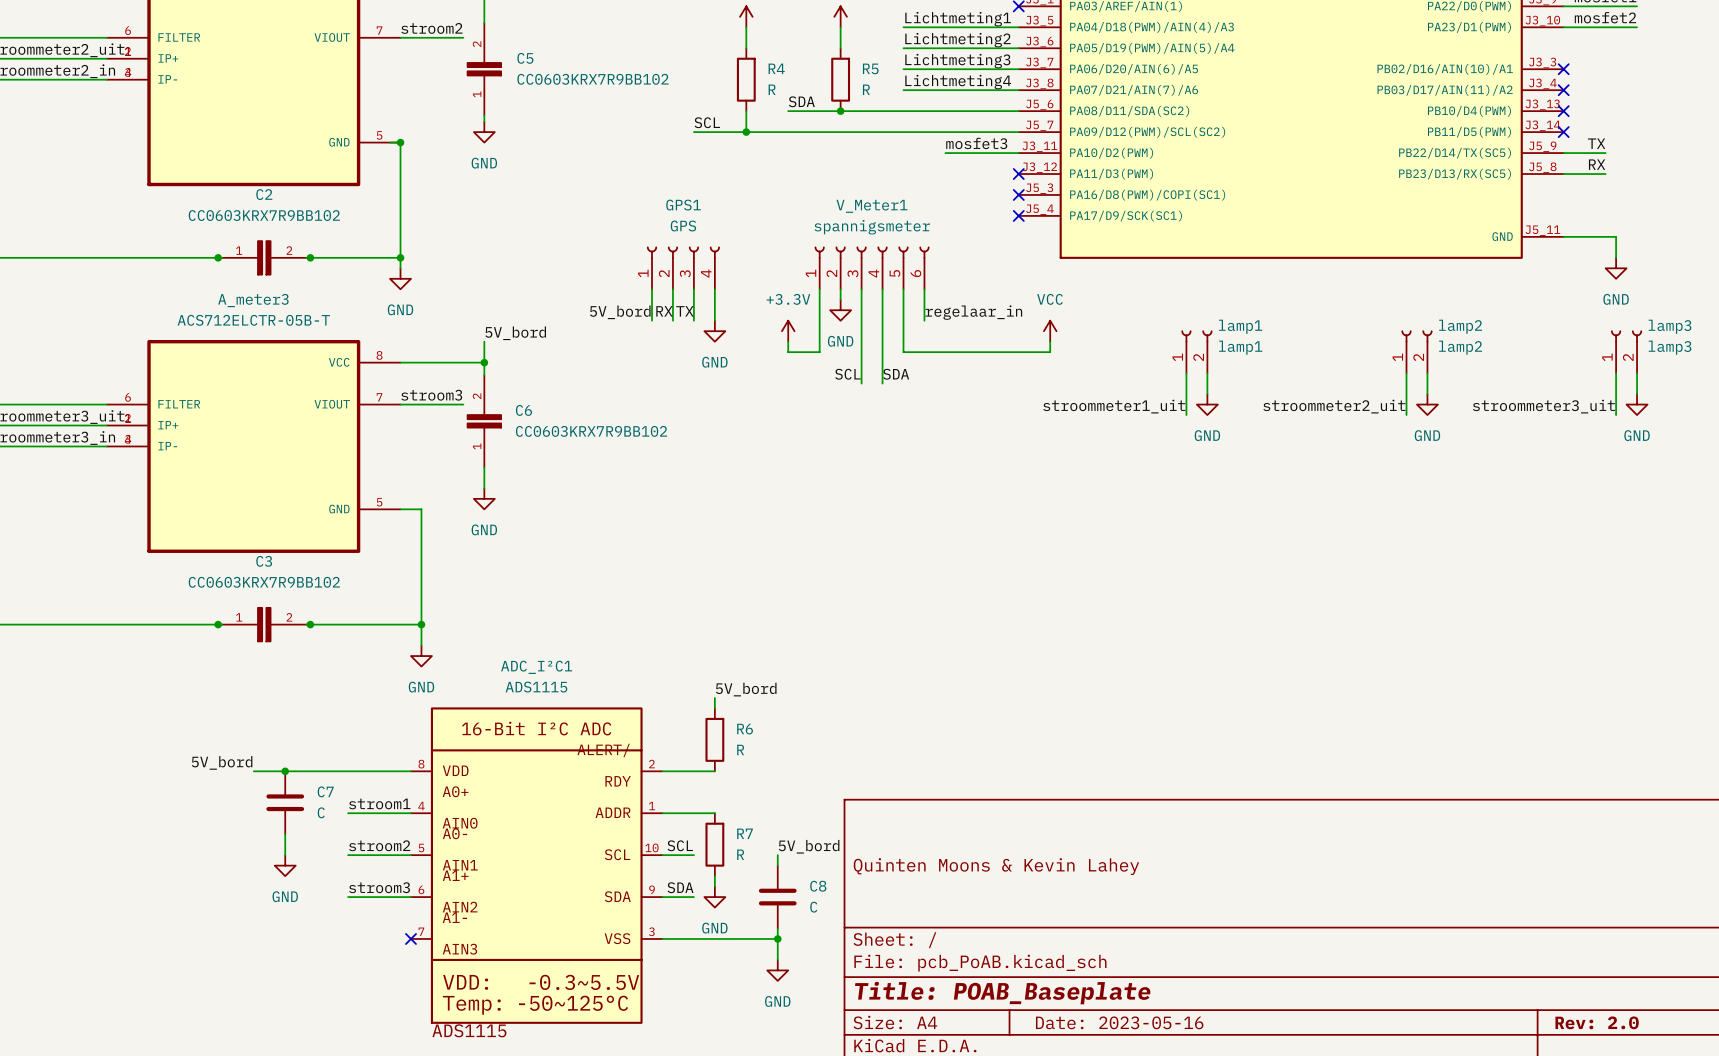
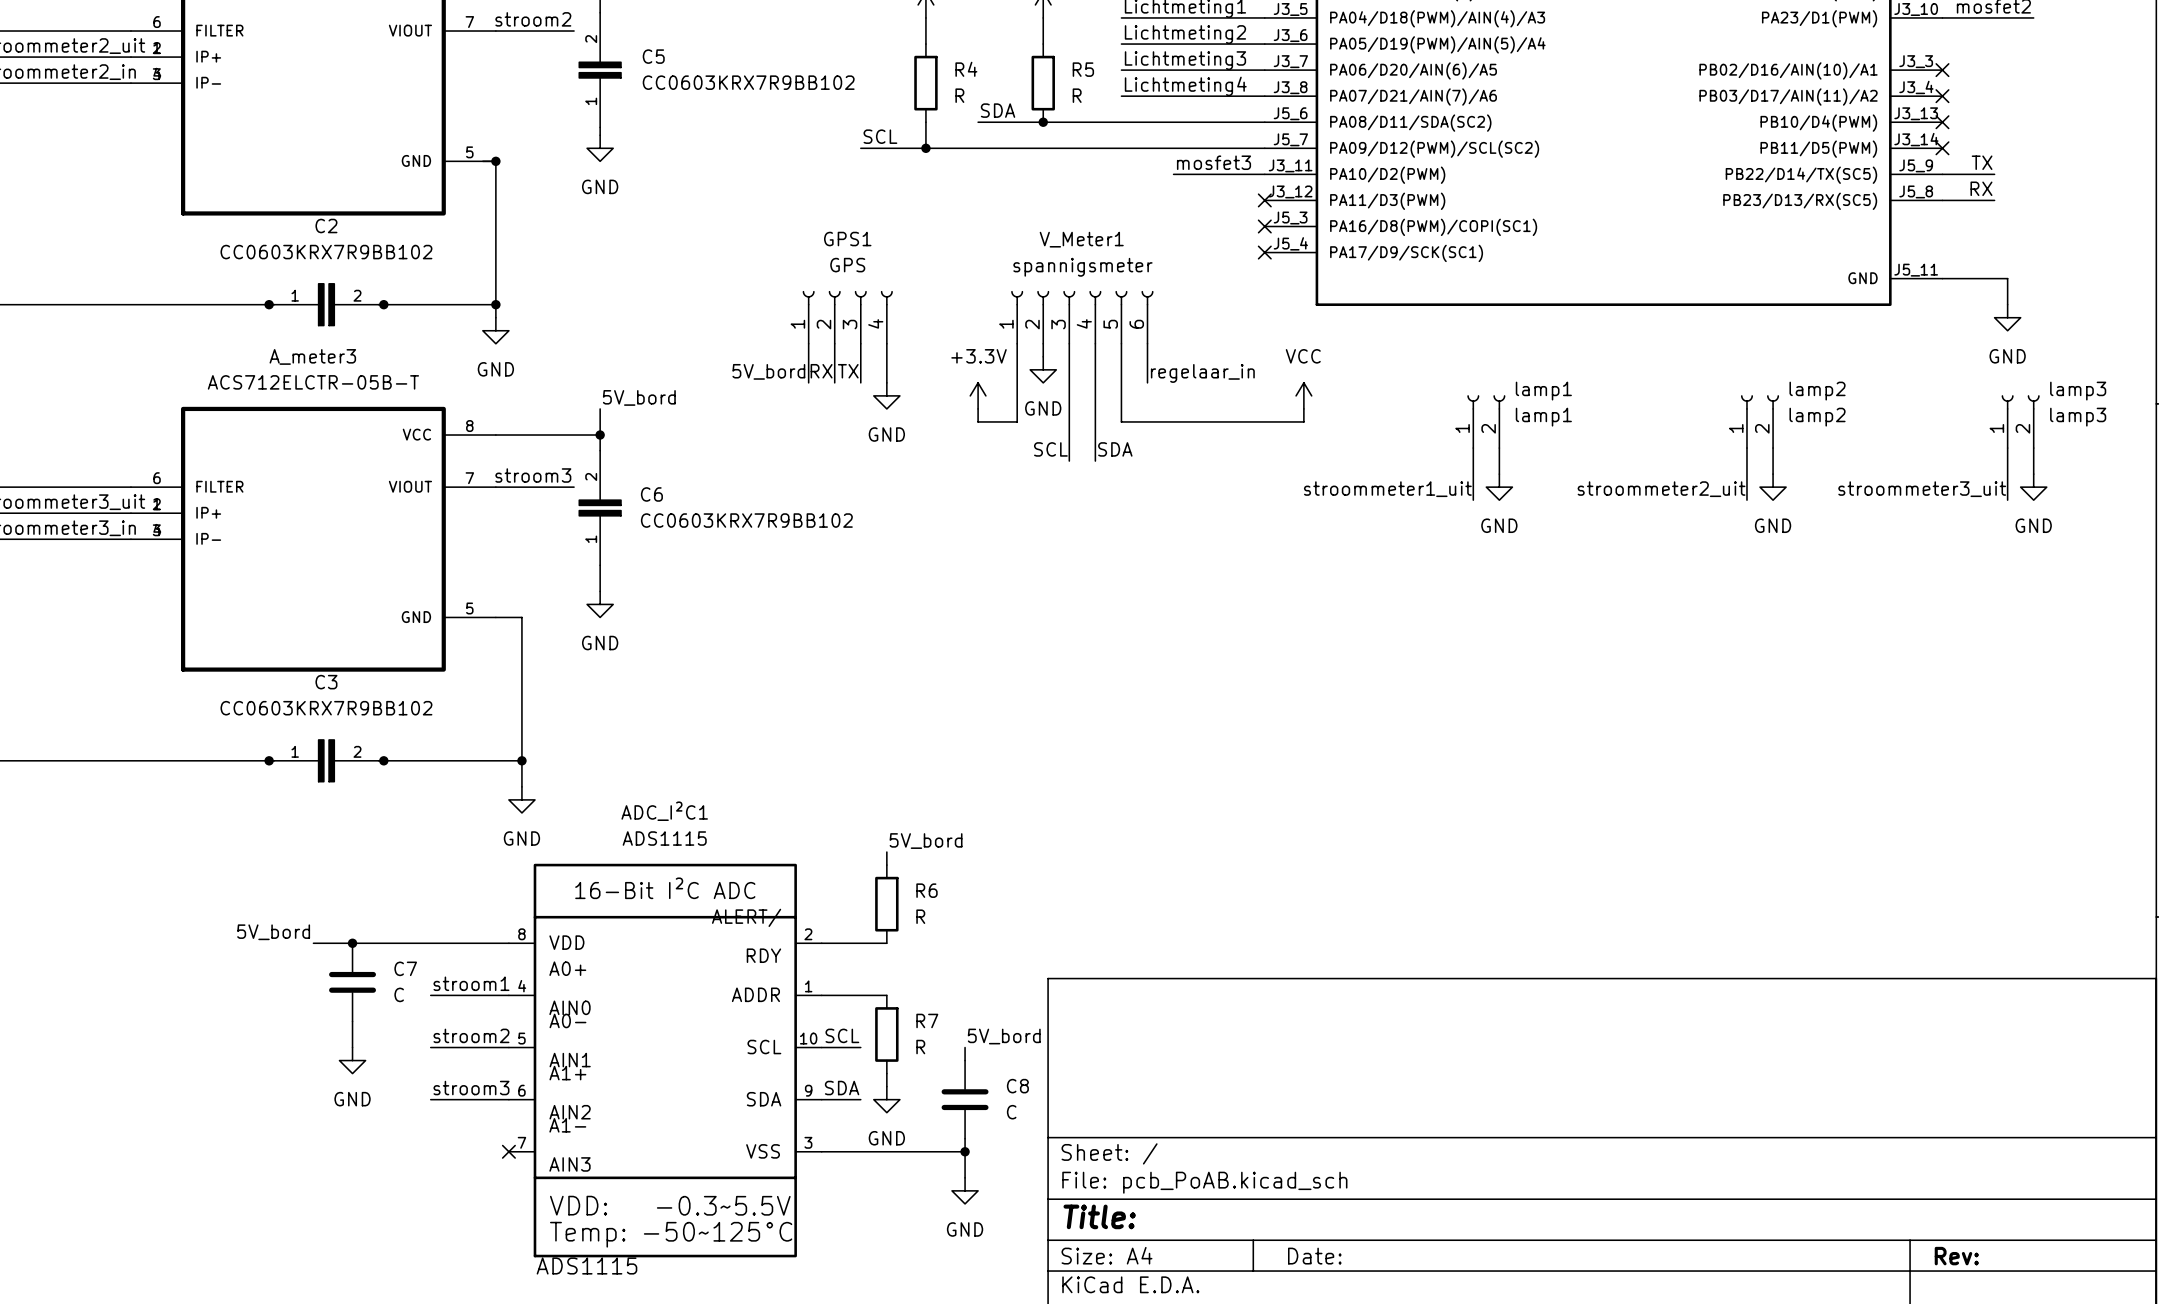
title block: Quinten Moons & Kevin Lahey (996, 866) -> none
title block: Title: POAB_Baseplate (1002, 993) -> Title: (1099, 1216)
title block: Date: 2023-05-16 (1119, 1022) -> Date: (1314, 1256)
title block: Rev: 2.0 (1597, 1022) -> Rev: (1956, 1256)

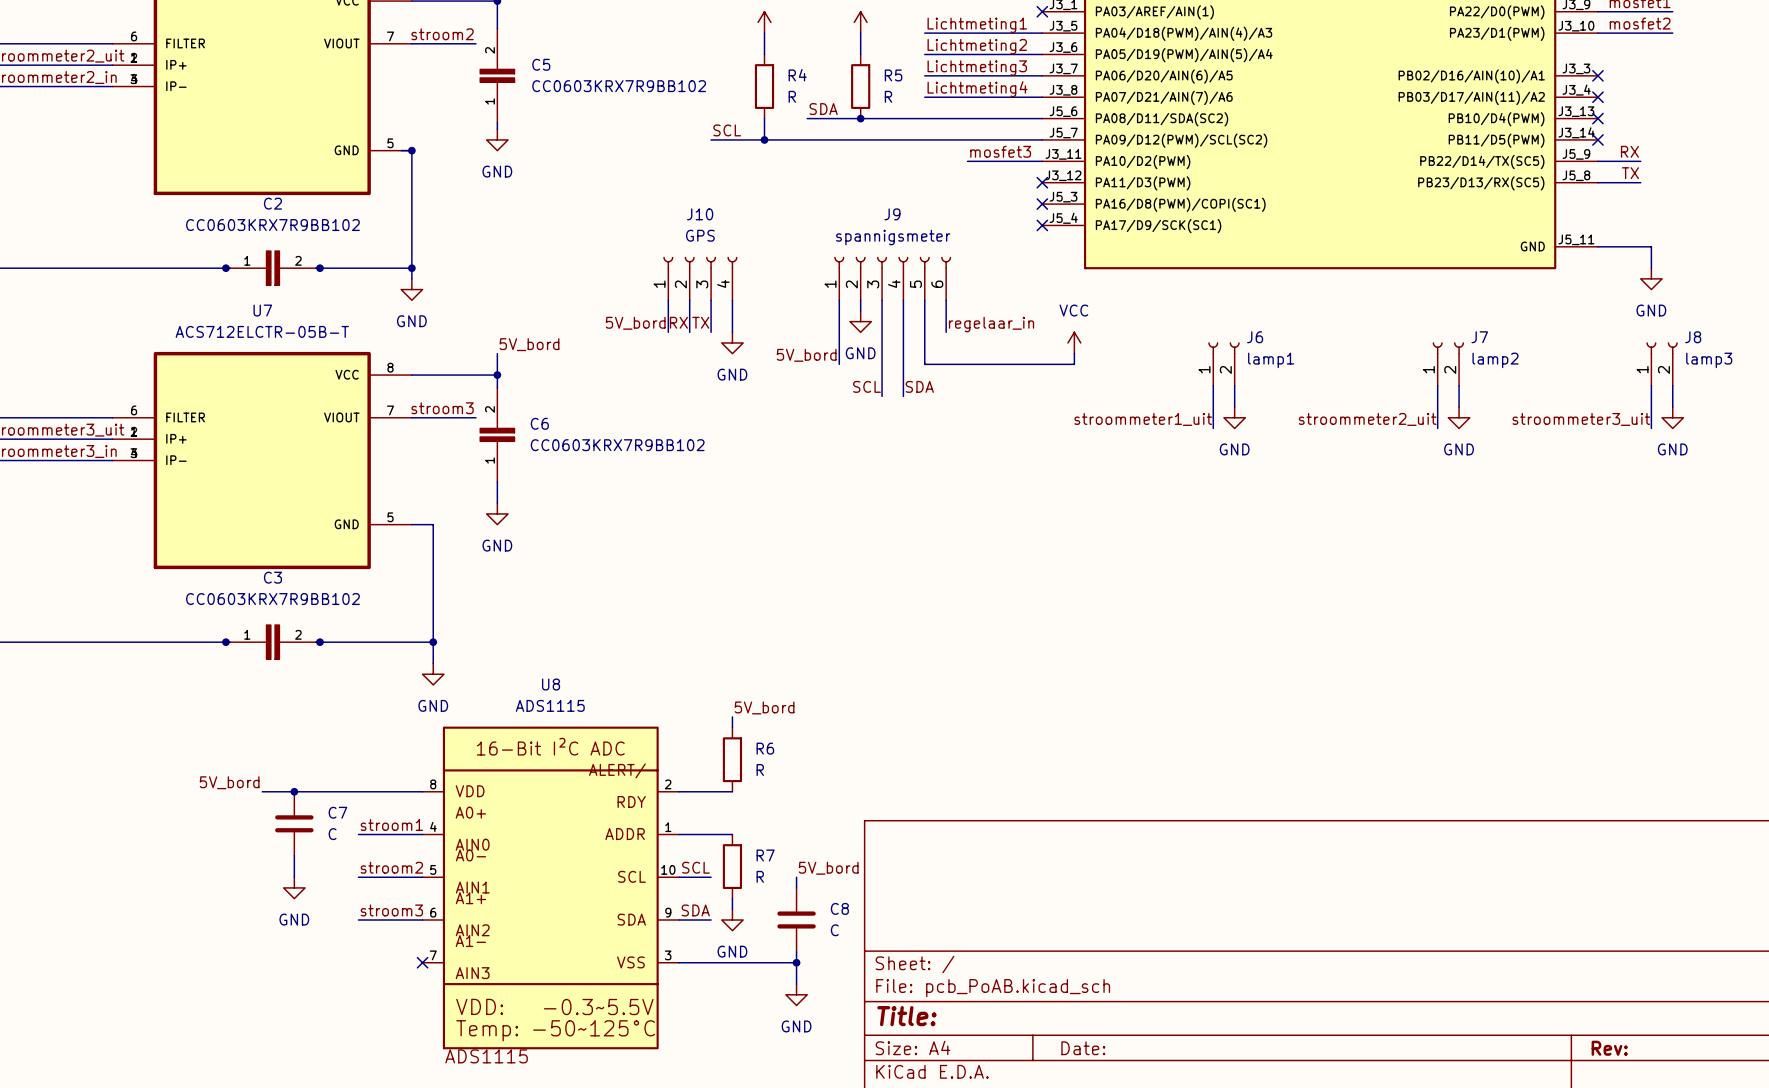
label: TX (1982, 162) -> RX (1629, 151)
label: RX (1981, 188) -> TX (1630, 173)
GPS1 name: GPS1 (847, 239) -> J10 (700, 214)
V_Meter1 name: V_Meter1 (1081, 239) -> J9 (892, 214)
A_meter3 name: A_meter3 (312, 356) -> U7 (262, 310)
lamp1 name: lamp1 (1543, 391) -> J6 (1255, 337)
lamp2 name: lamp2 (1817, 391) -> J7 (1479, 337)
lamp3 name: lamp3 (2078, 391) -> J8 (1693, 337)
power symbol: +3.3V (978, 395) -> none
wire: (978, 408) (978, 421) (1017, 421) -> none
label: none -> 5V_bord (806, 355)
ADC_I²C1 name: ADC_I²C1 (664, 811) -> U8 (551, 684)

